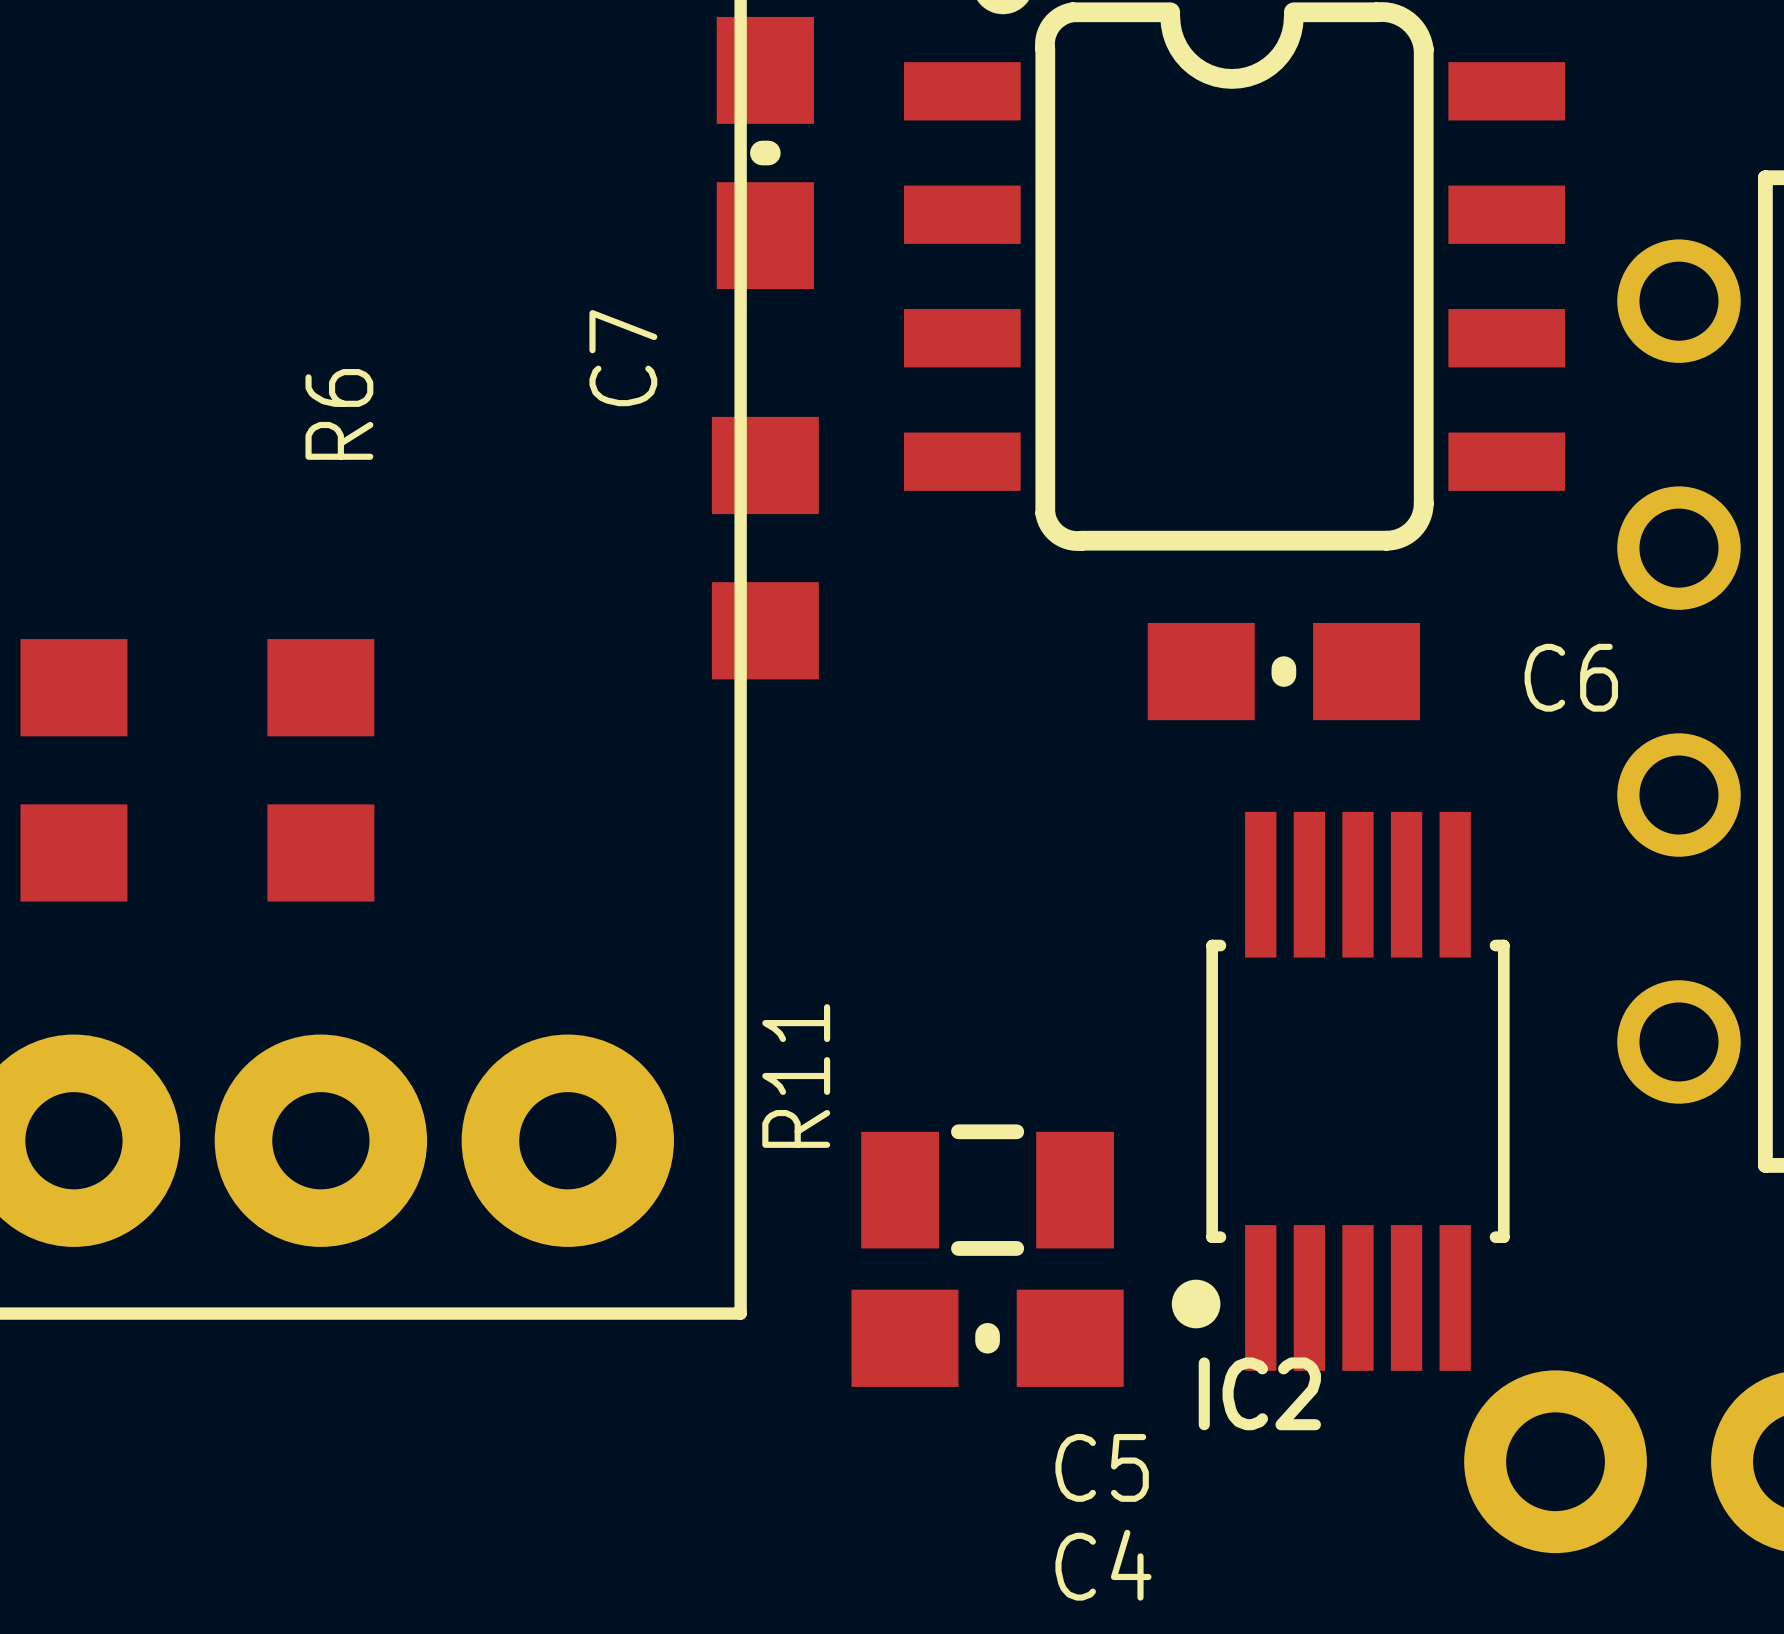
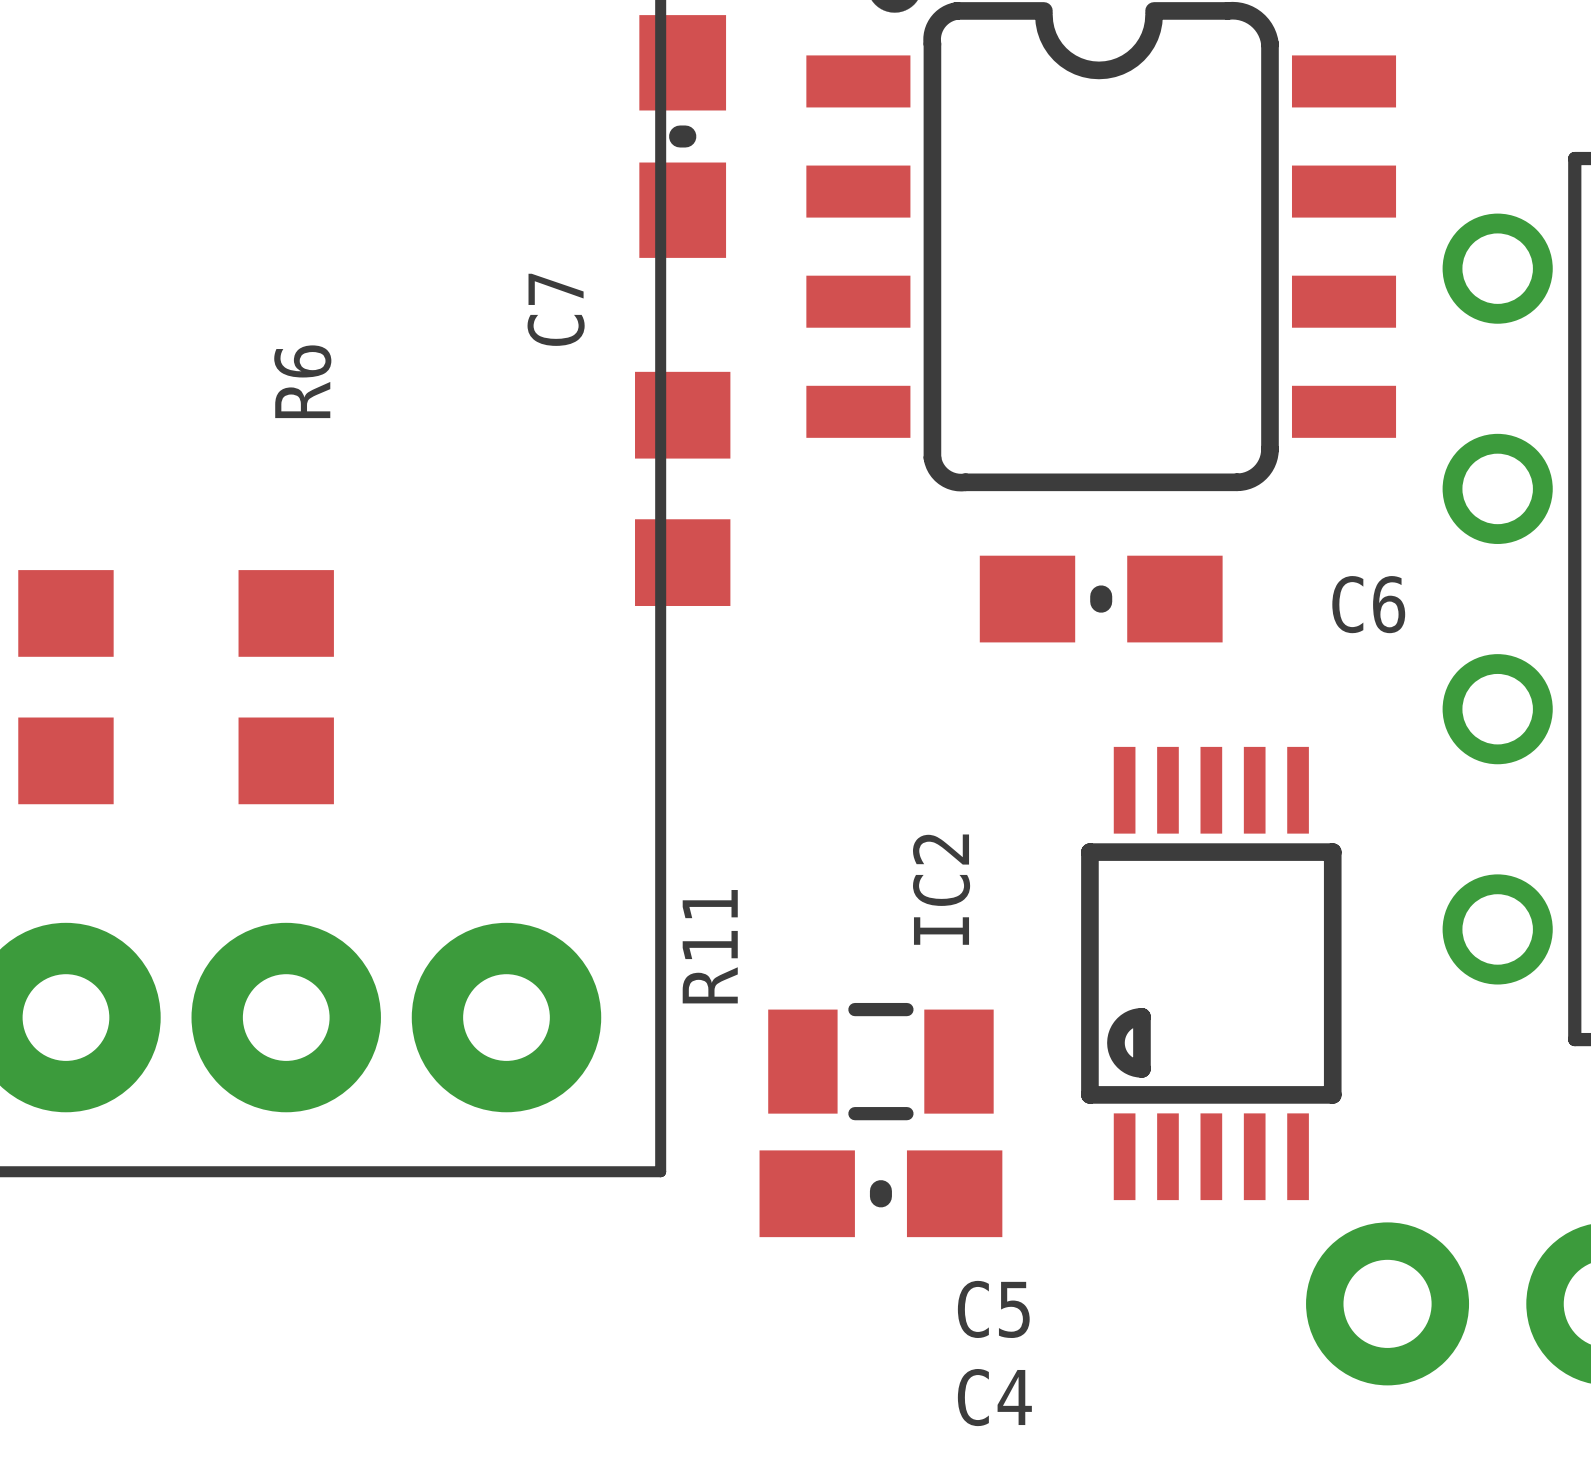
C6 position: (1283, 671) -> (1101, 599)
IC2 footprint: [1171, 811, 1510, 1371] -> [1081, 746, 1342, 1201]
IC2 name position: IC2 (1259, 1393) -> IC2 (941, 889)

